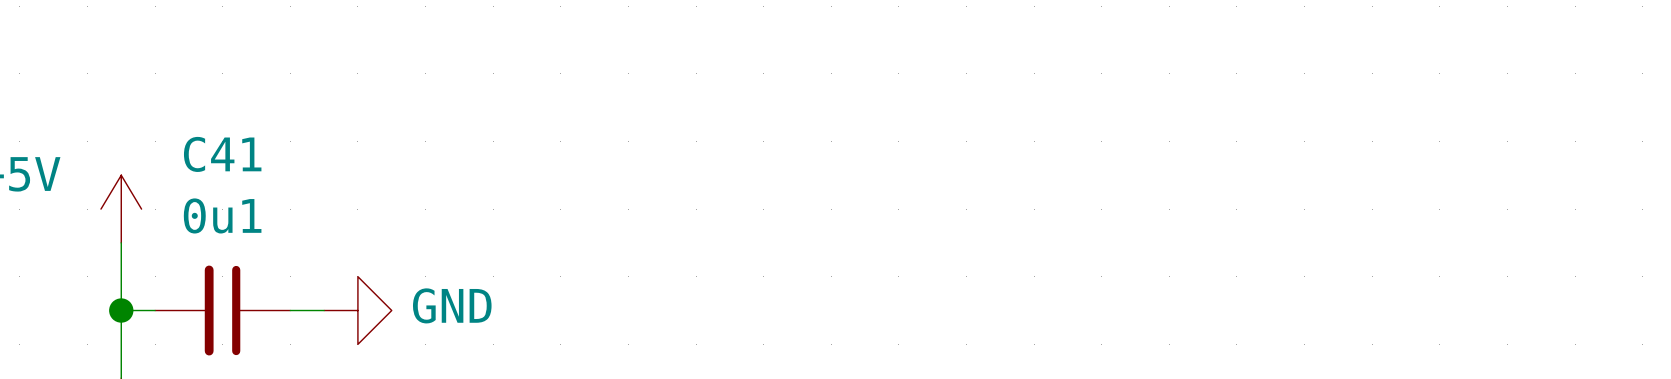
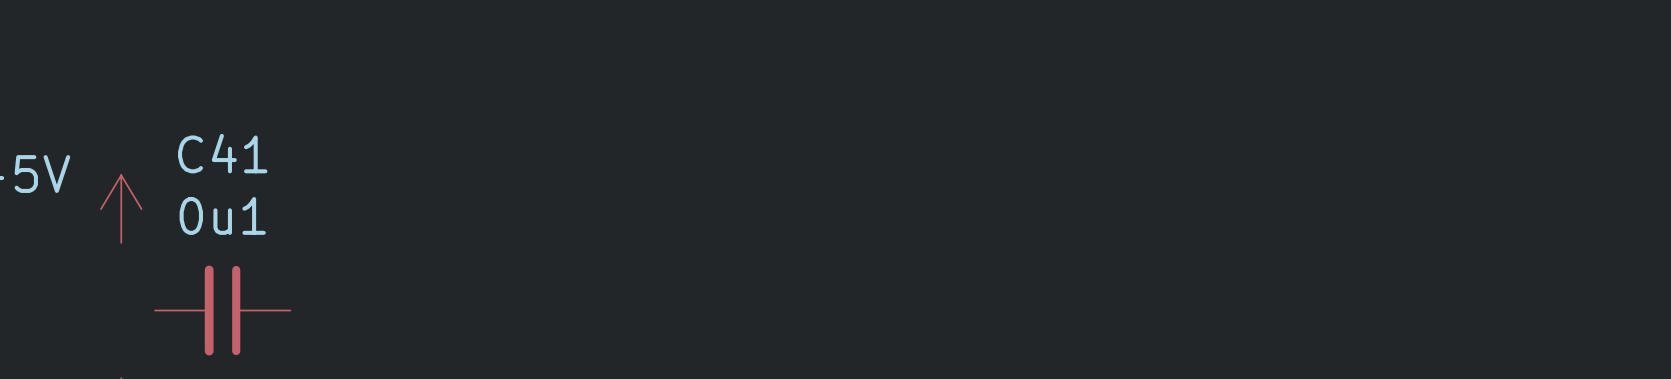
wire: (121, 242) (121, 378) -> none
wire: (121, 310) (155, 310) -> none
junction: (121, 310) -> none
wire: (290, 310) (324, 310) -> none
power symbol: GND (357, 310) -> none

